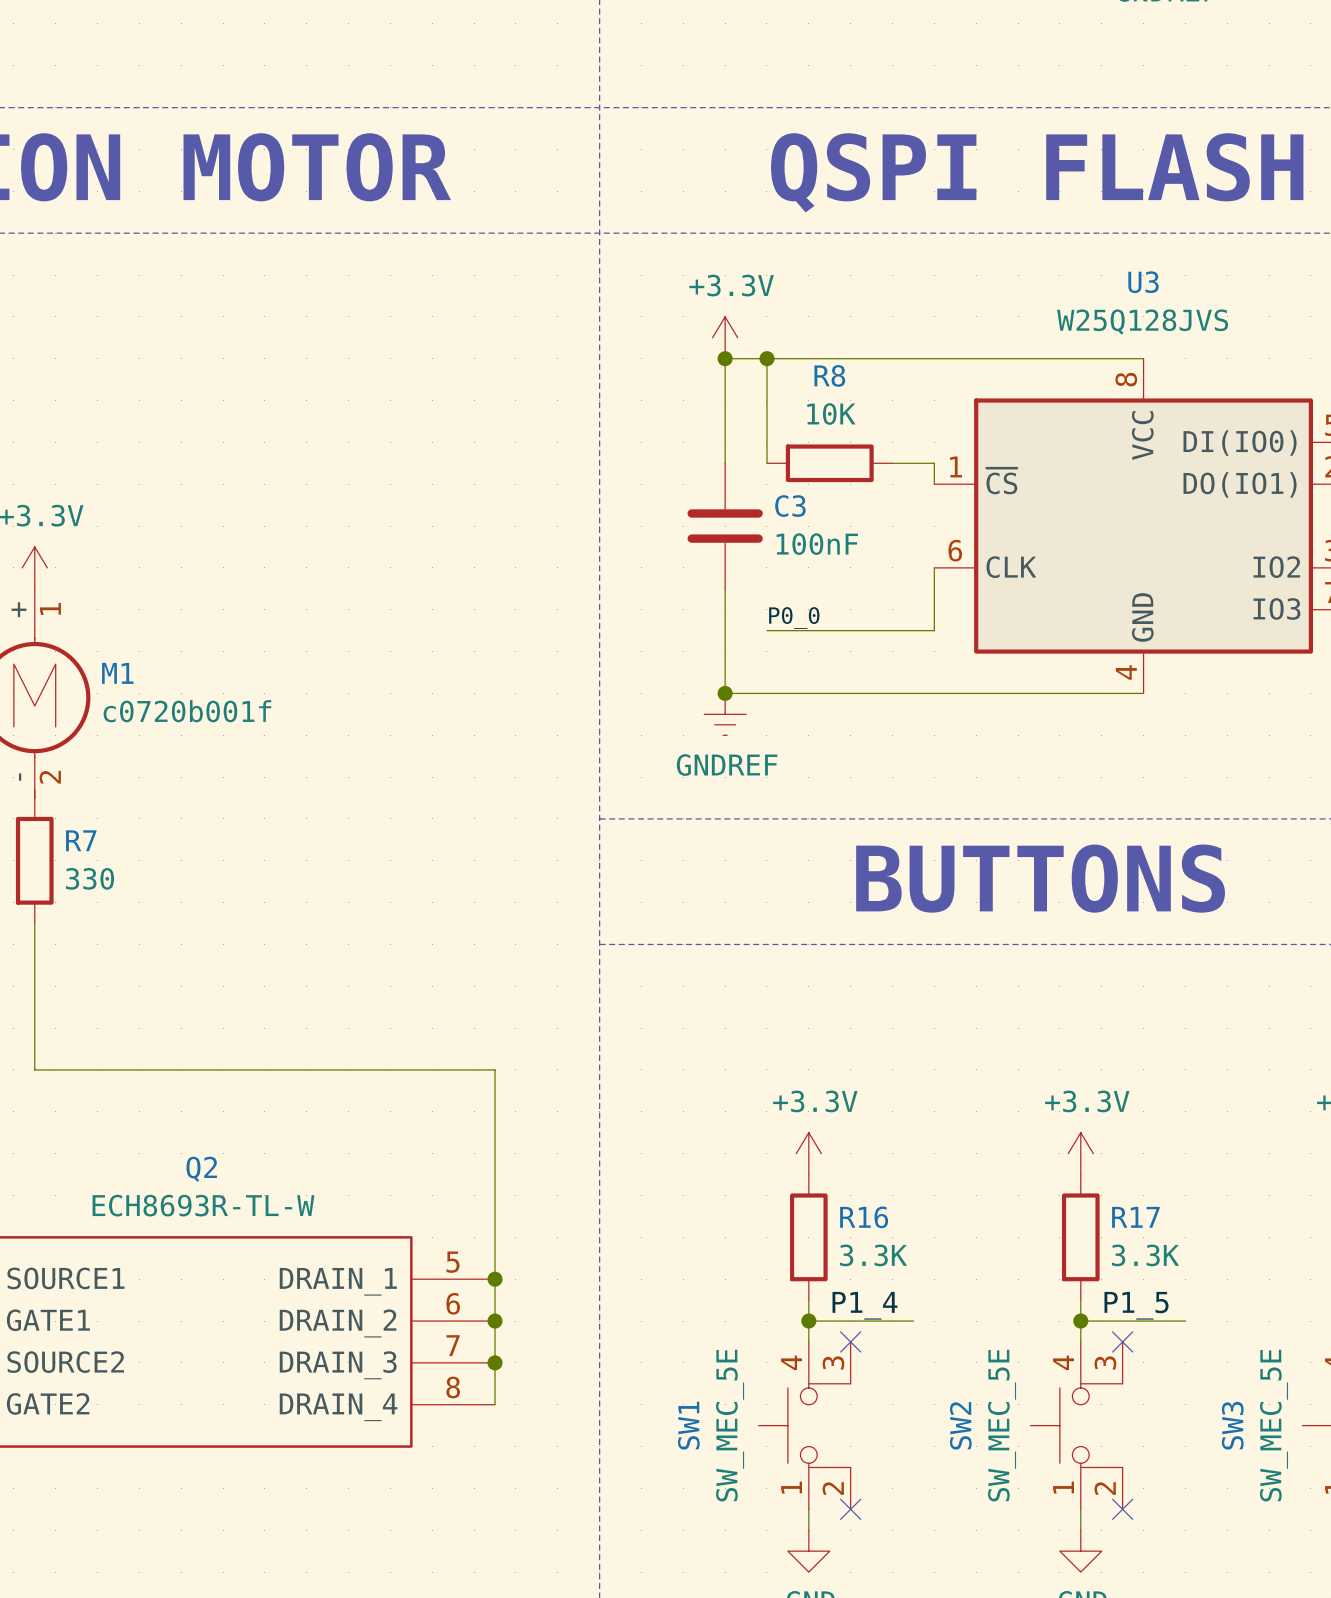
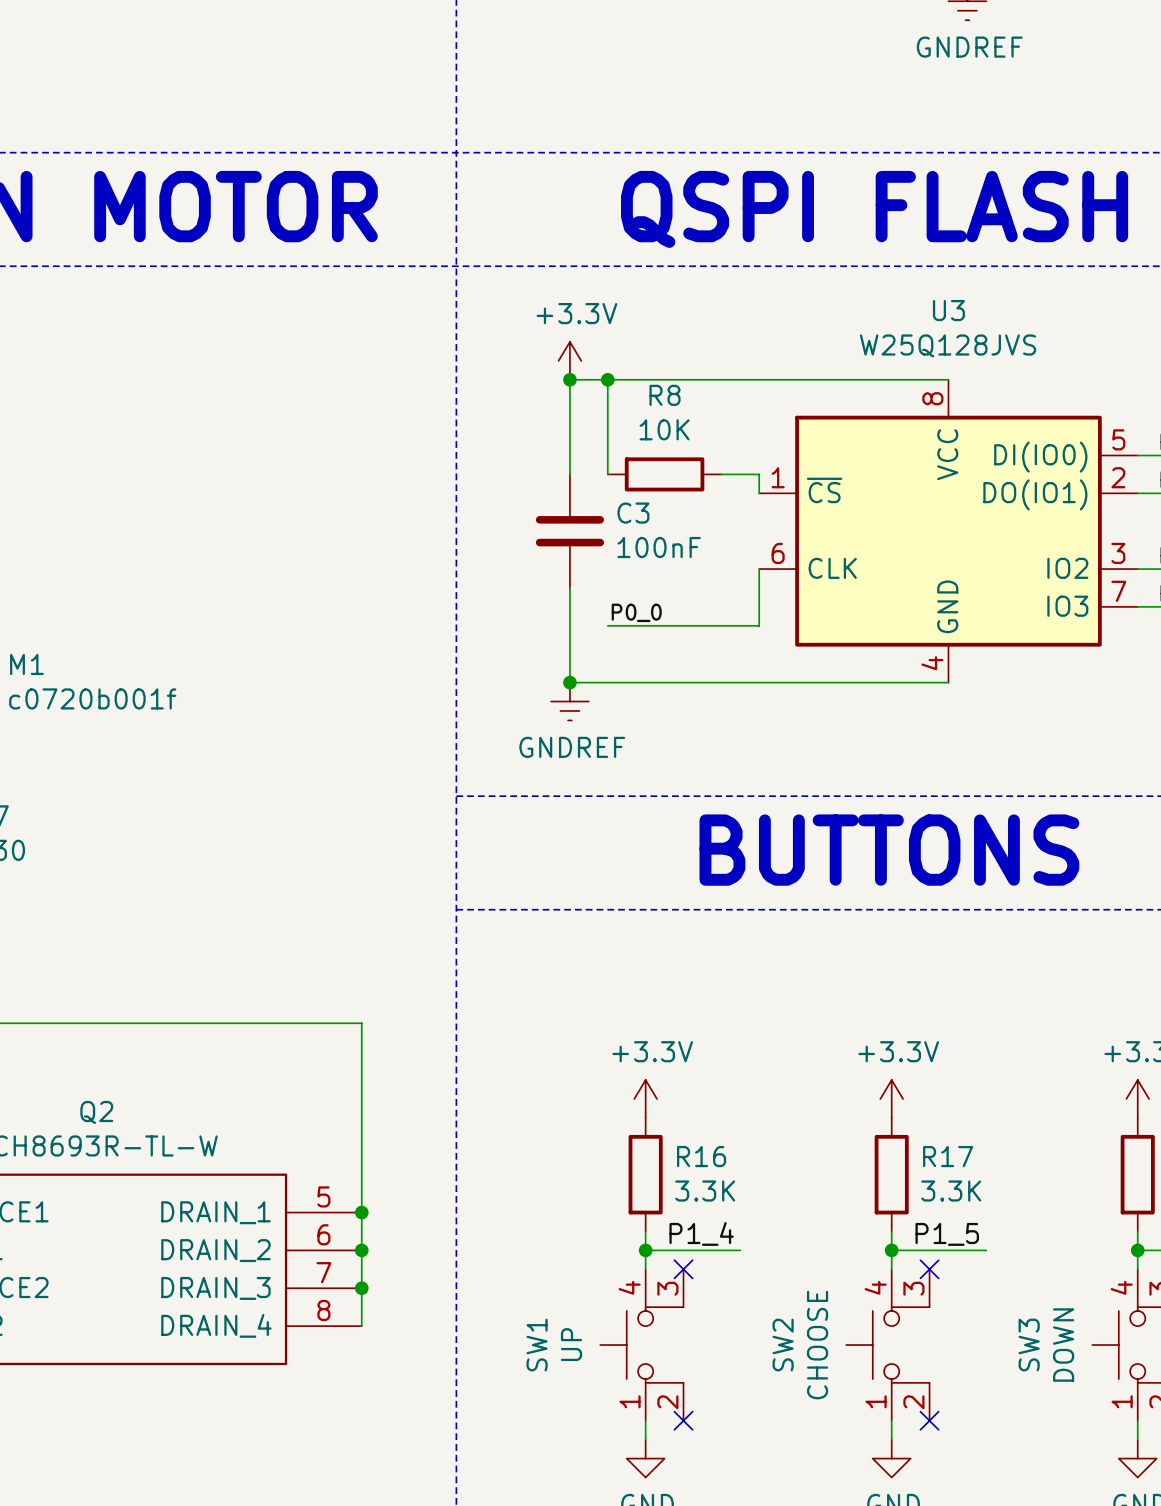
SW1 value: SW_MEC_5E (730, 1425) -> UP (571, 1344)
SW2 value: SW_MEC_5E (1002, 1425) -> CHOOSE (817, 1345)
SW3 value: SW_MEC_5E (1274, 1425) -> DOWN (1063, 1345)

